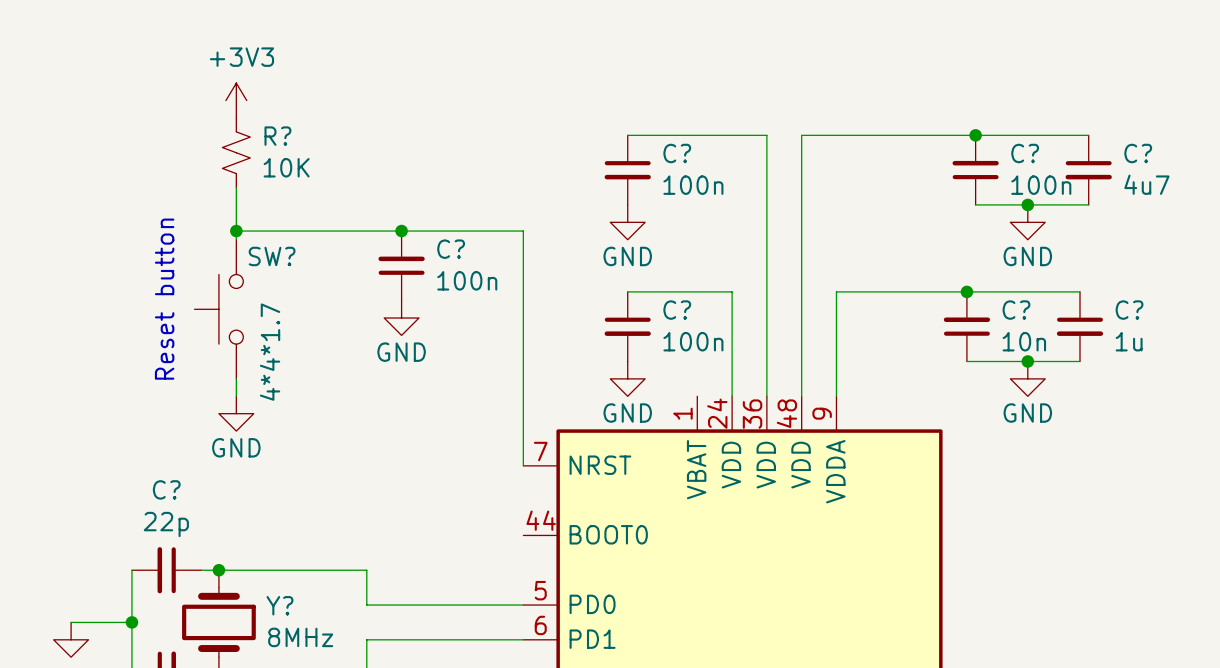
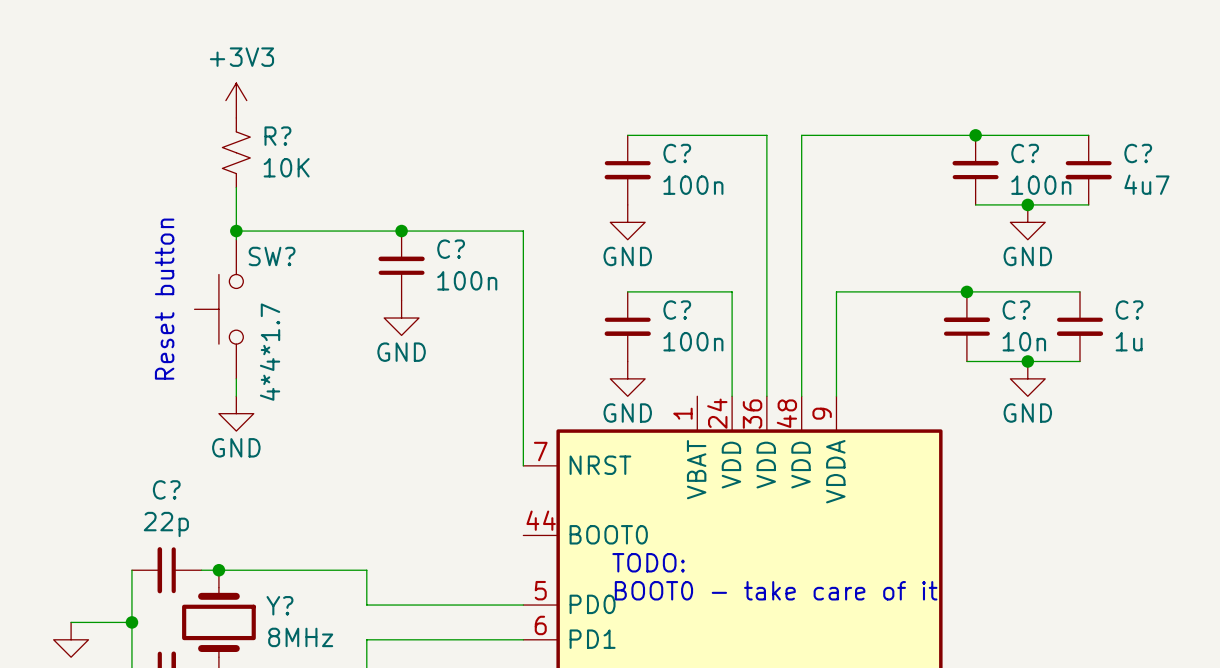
text: none -> TODO: (648, 562)
text: none -> BOOT0 - take care of it (776, 590)

